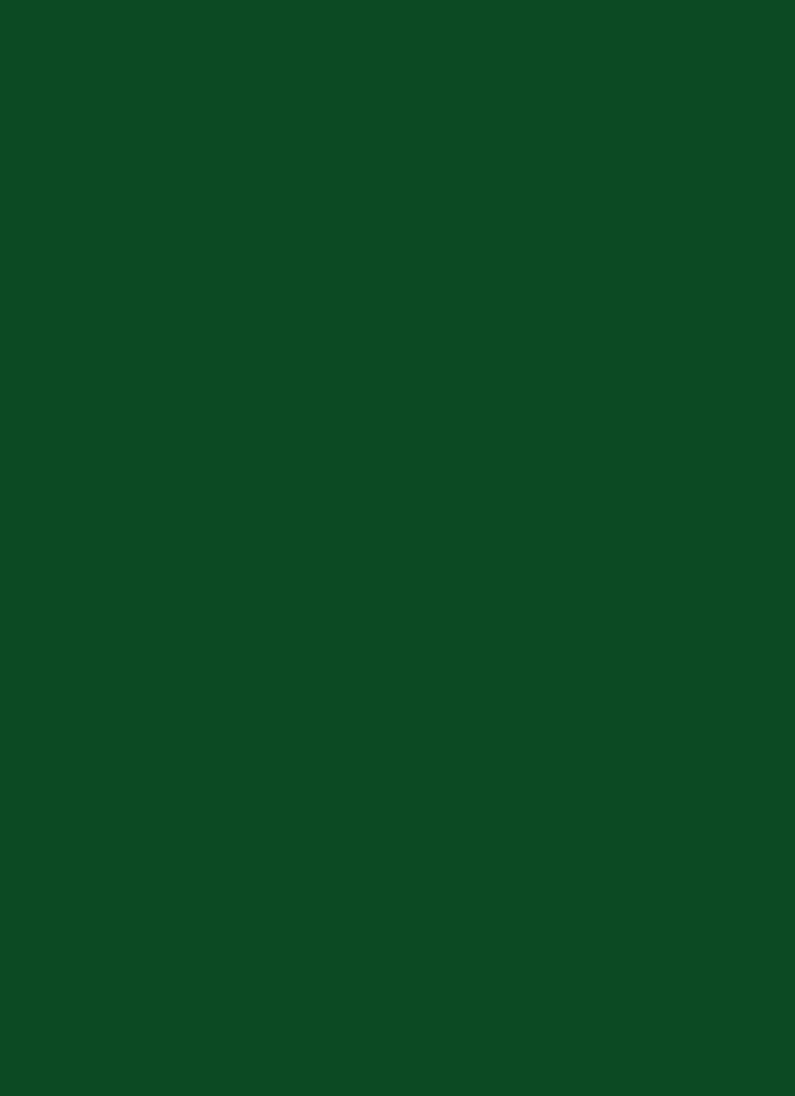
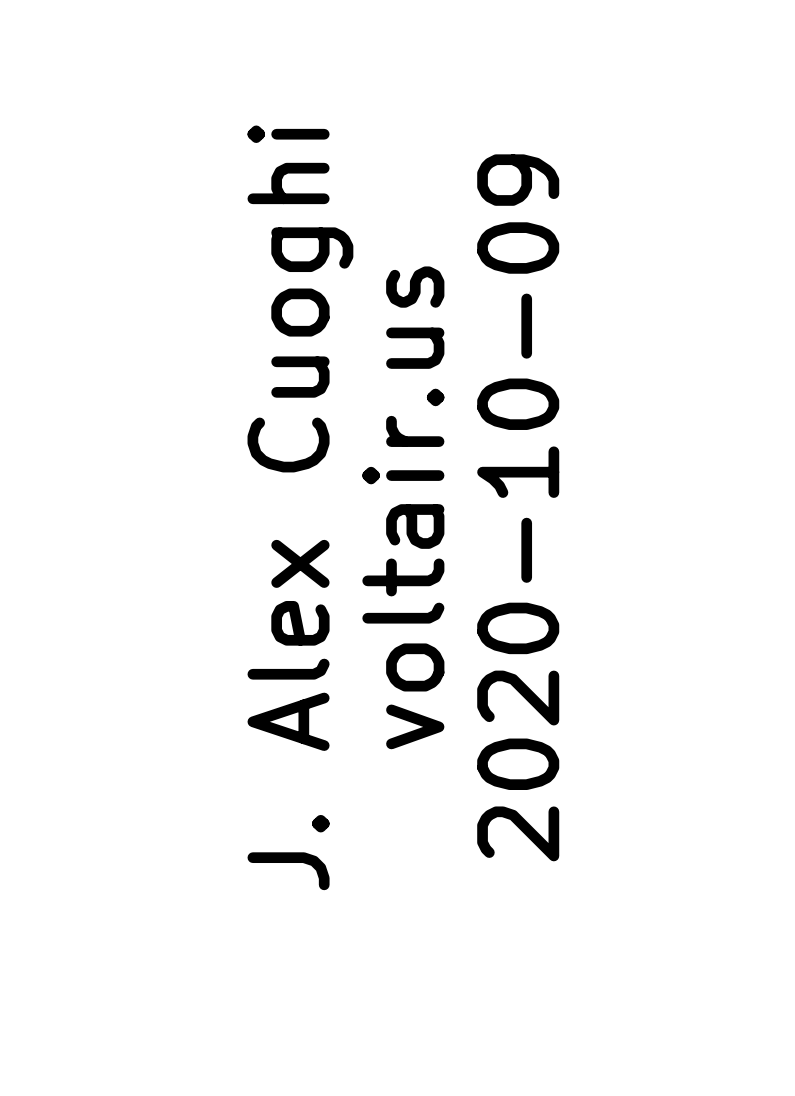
text: none -> J. Alex Cuoghi (300, 507)
text: none -> voltair.us (403, 507)
text: none -> 2020-10-09 (518, 507)

